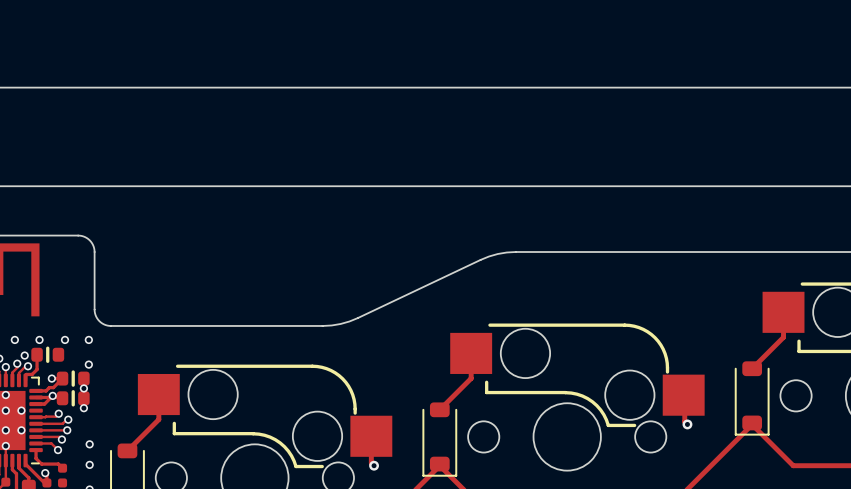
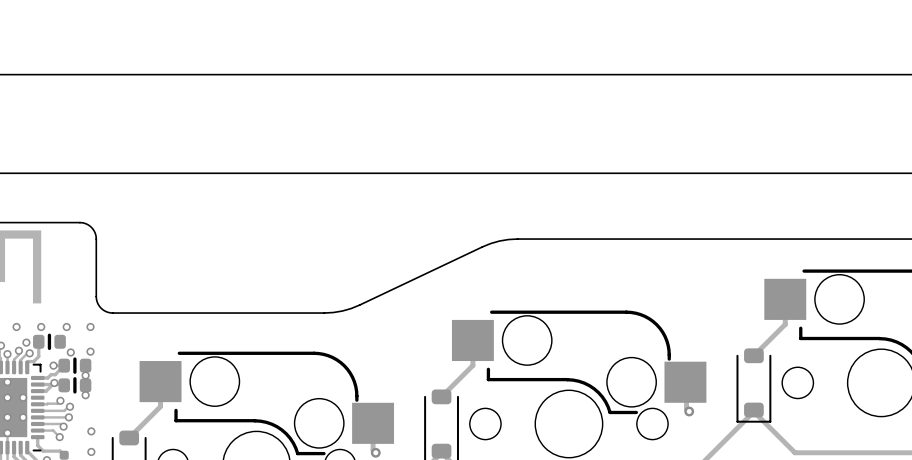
via: none -> (70, 352)

